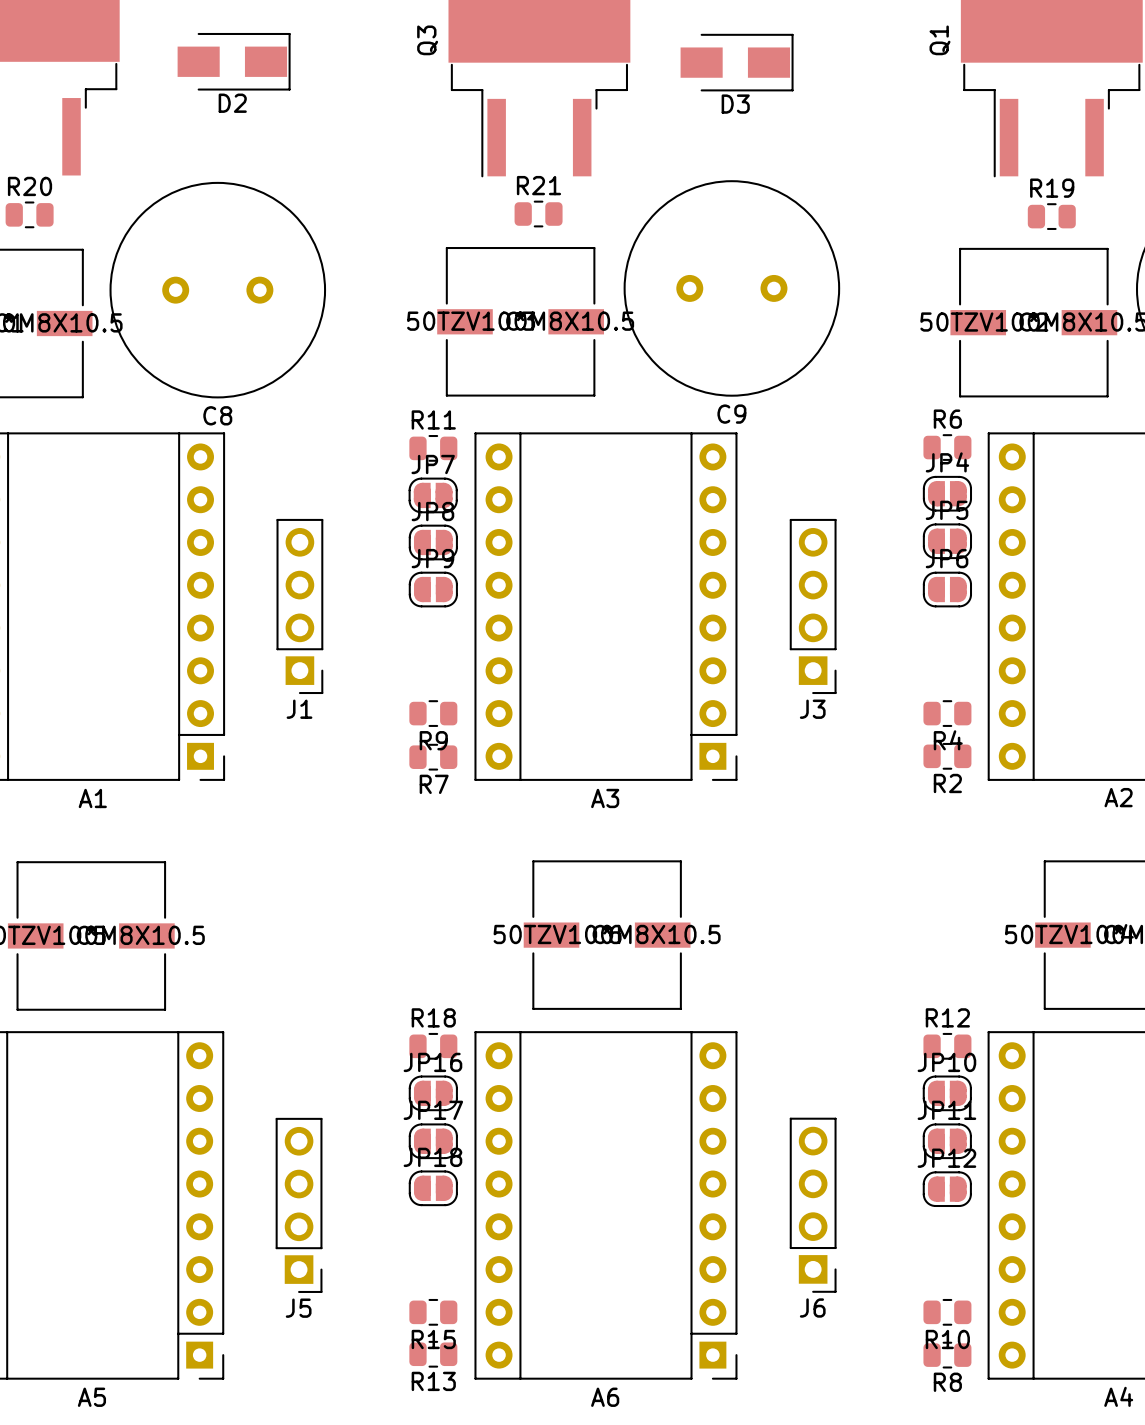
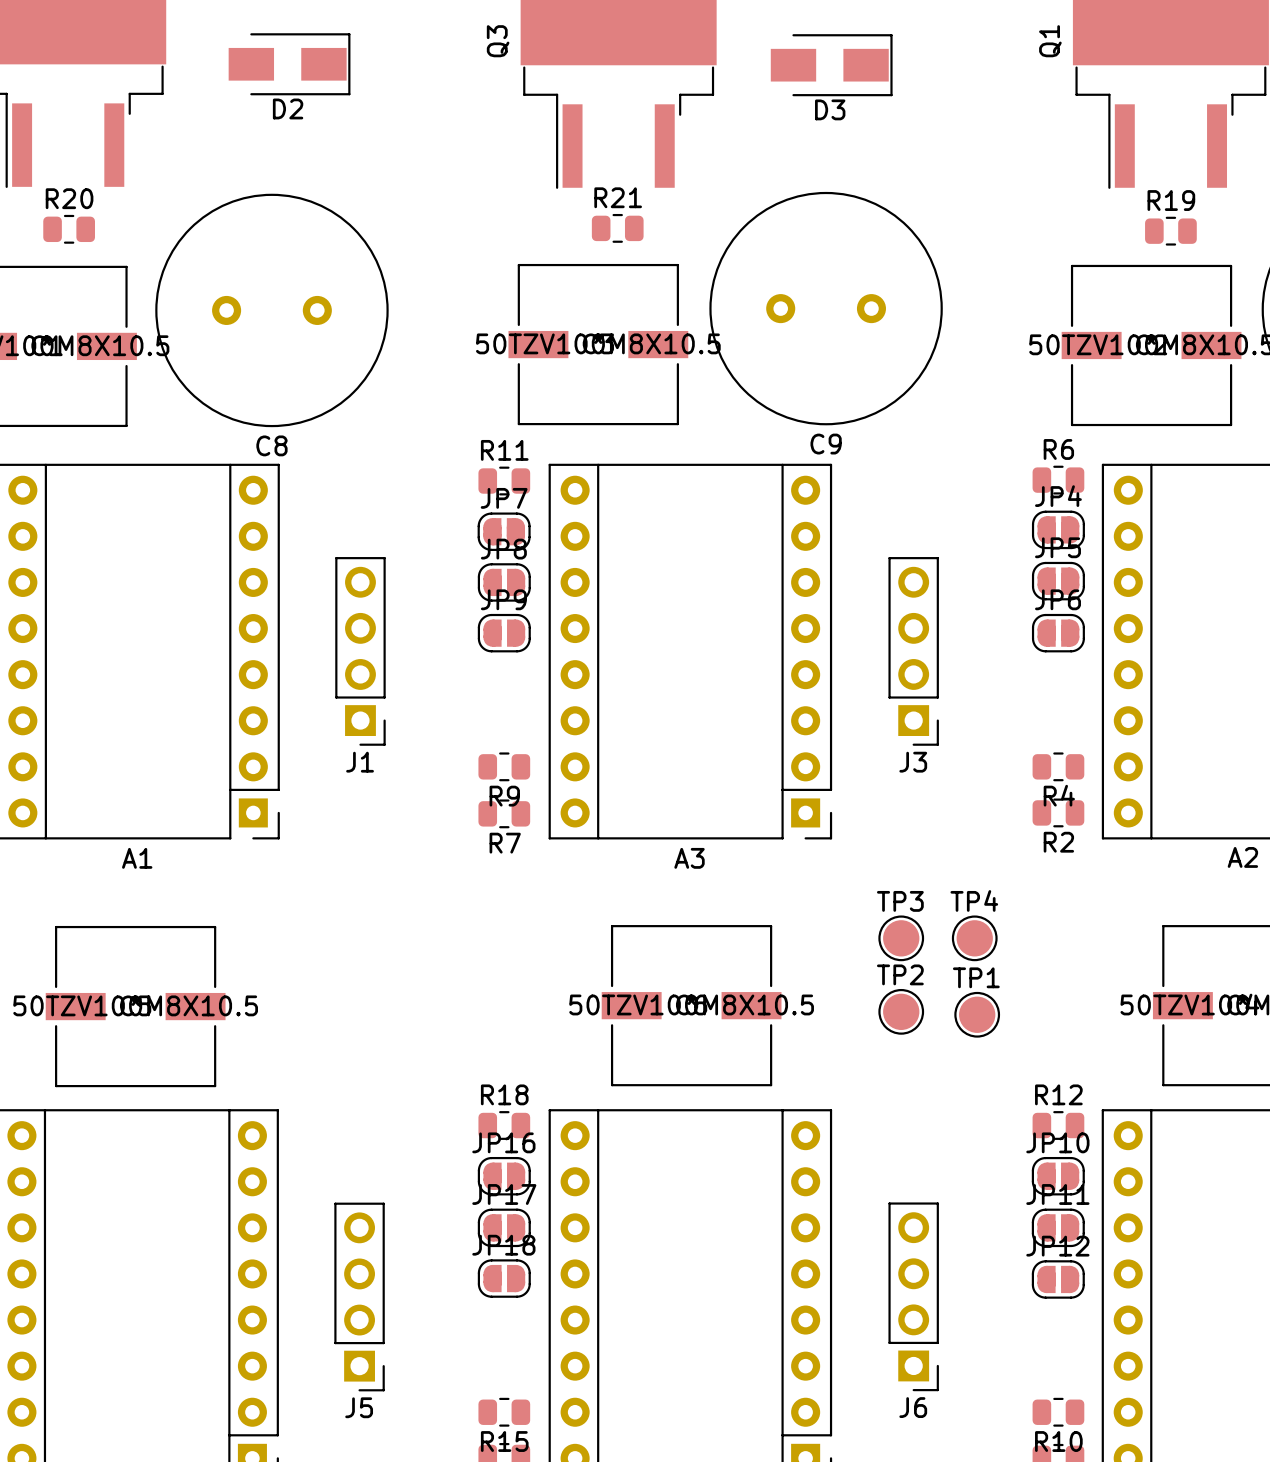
TP3: none -> (901, 938)
TP4: none -> (974, 938)
TP2: none -> (901, 1011)
TP1: none -> (977, 1014)

